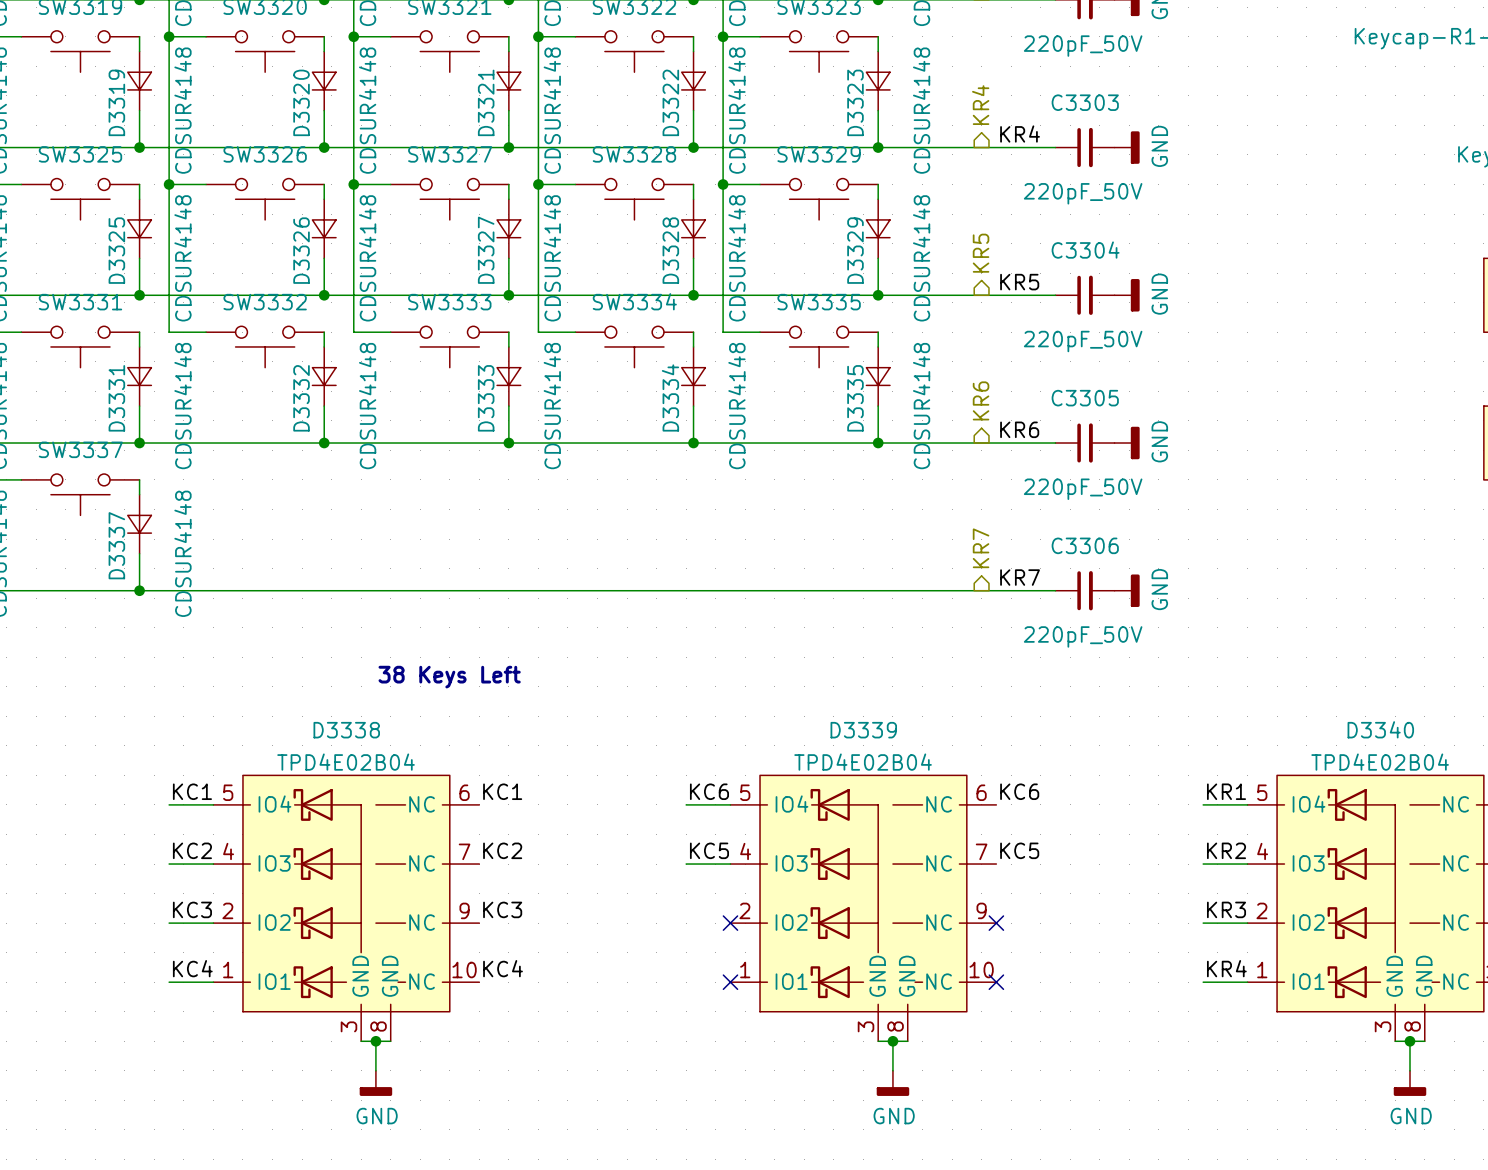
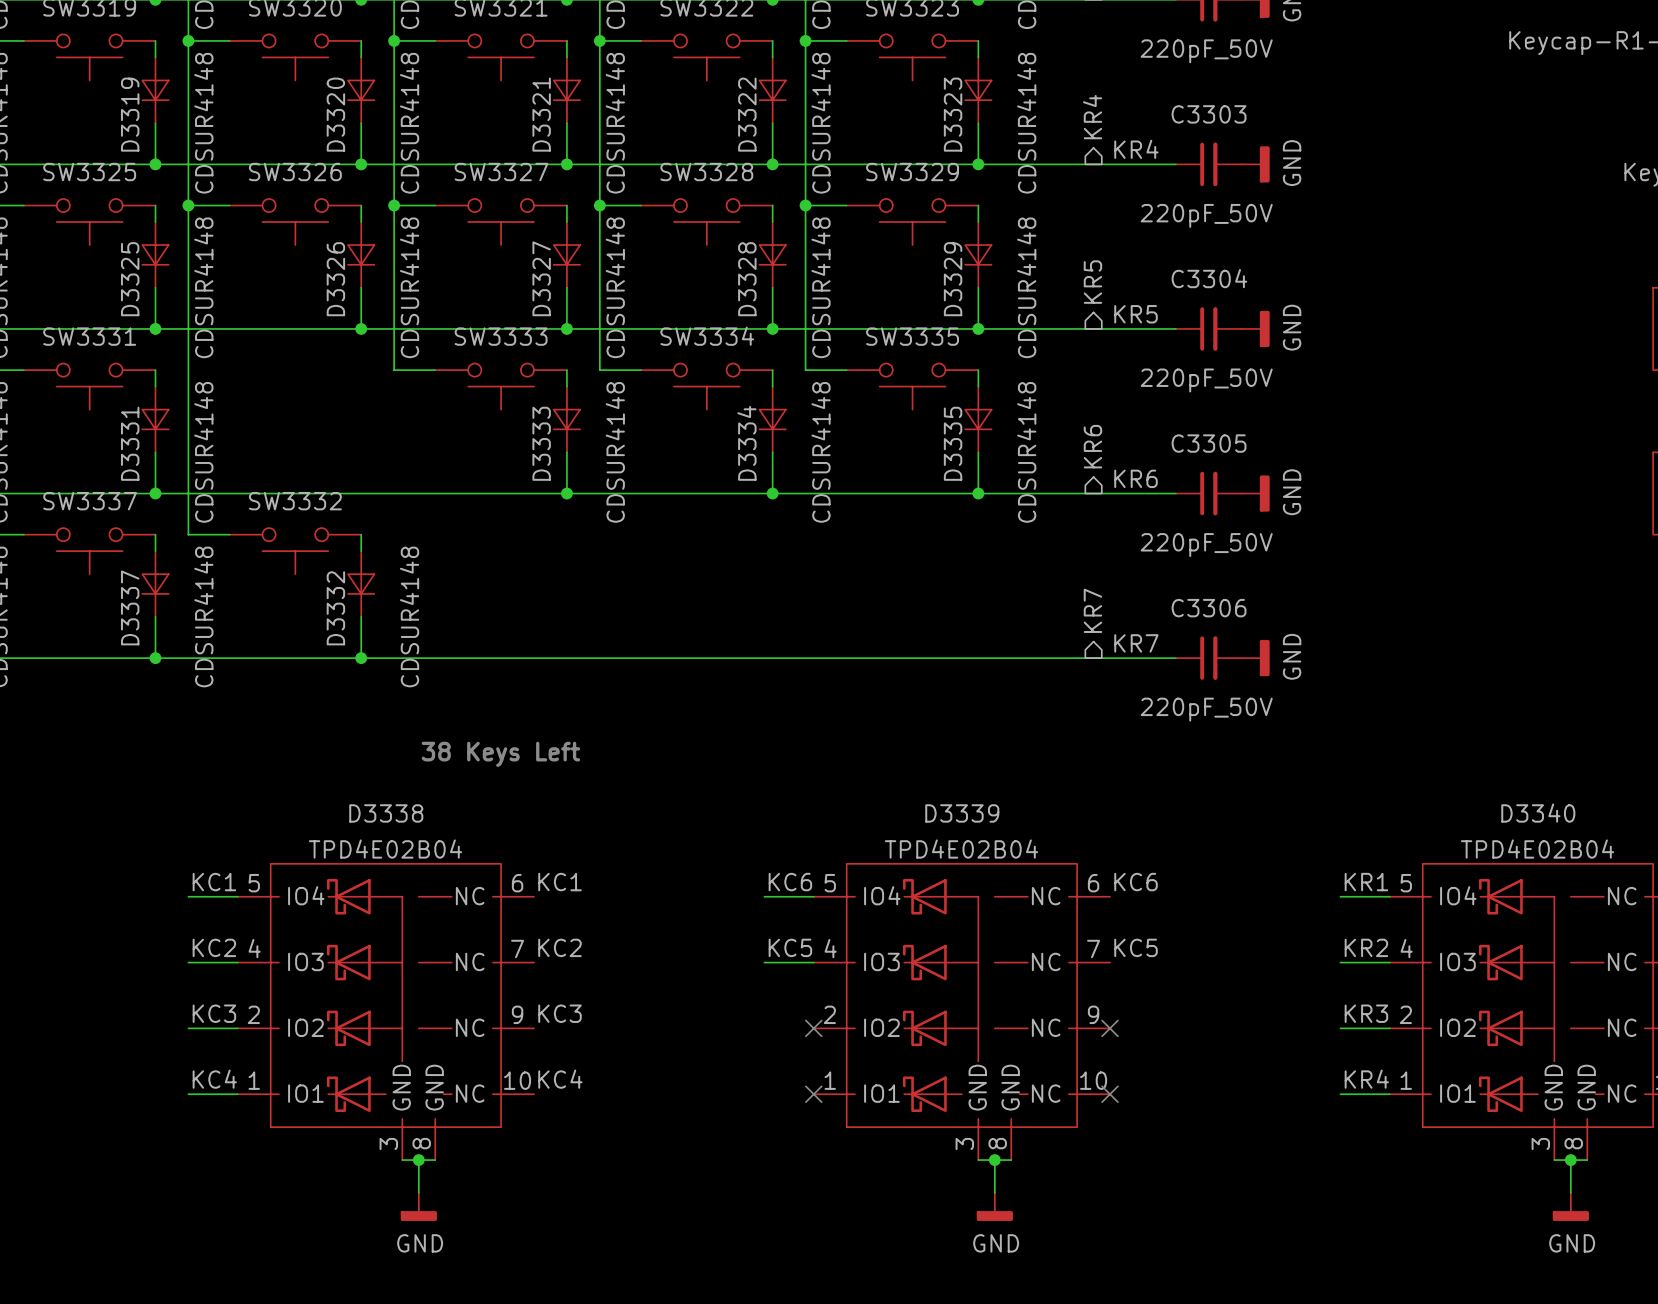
wire: (169, 332) (206, 332) -> (188, 370) (188, 534) (229, 534)
wire: (324, 332) (324, 346) -> (361, 534) (361, 551)
SW3332 position: (265, 346) -> (295, 551)
D3332 position: (324, 376) -> (361, 584)
wire: (324, 406) (324, 443) -> (361, 616) (361, 658)
junction: (324, 443) -> none
junction: none -> (361, 658)

